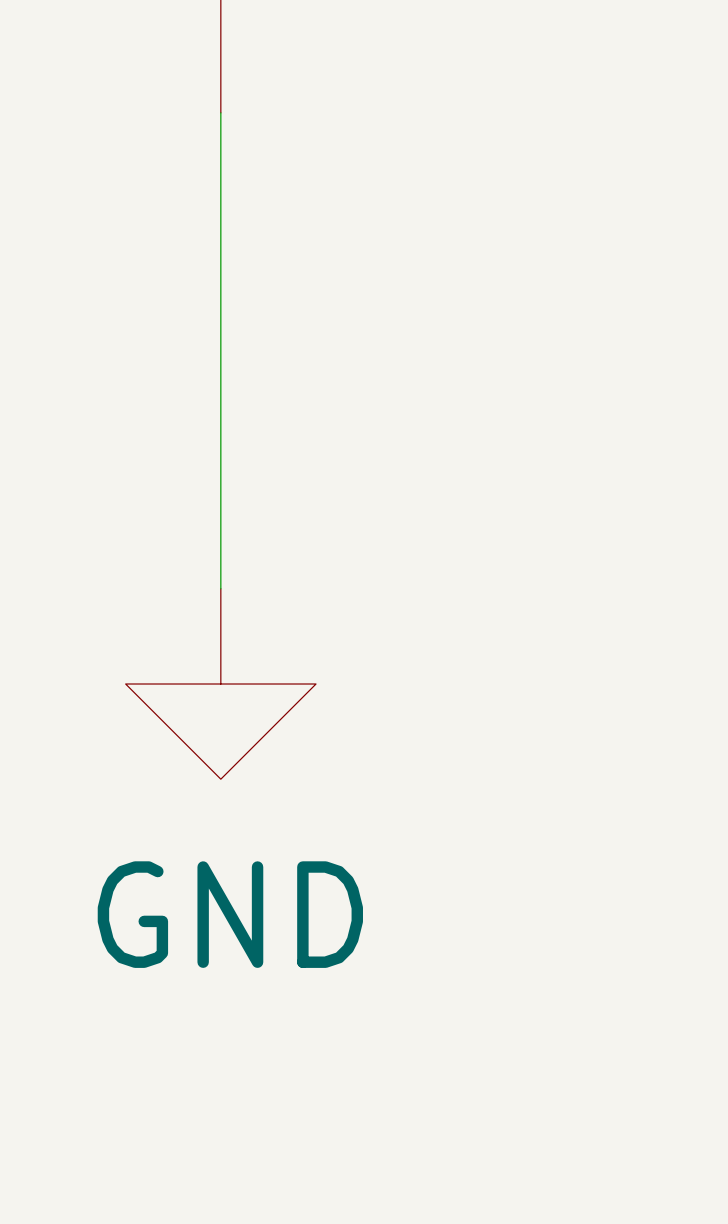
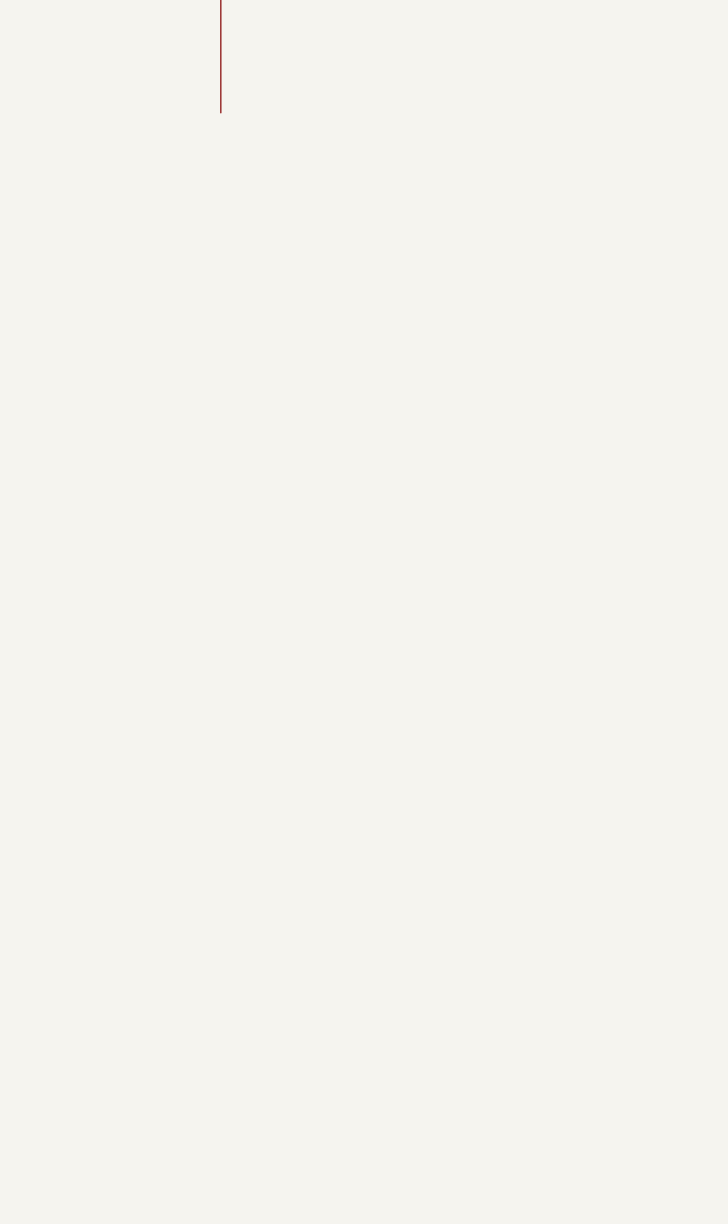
wire: (220, 112) (220, 588) -> none
power symbol: GND (220, 684) -> none

